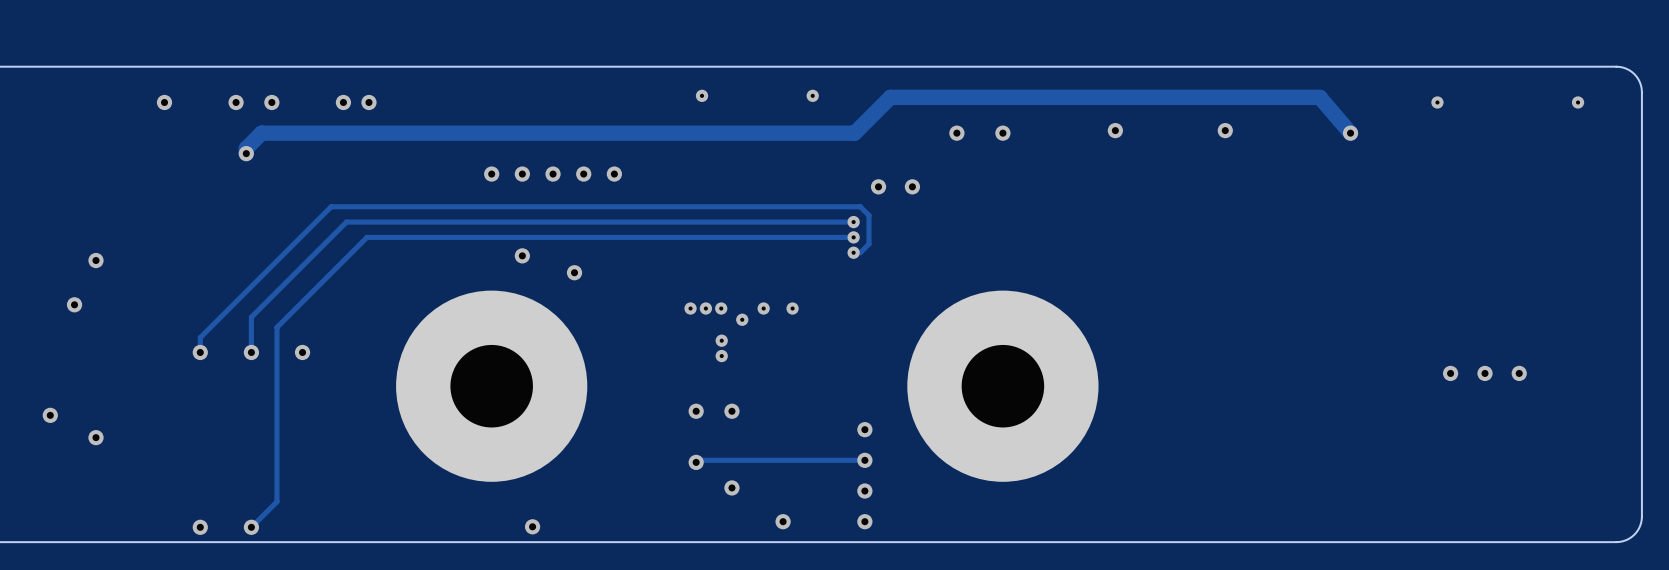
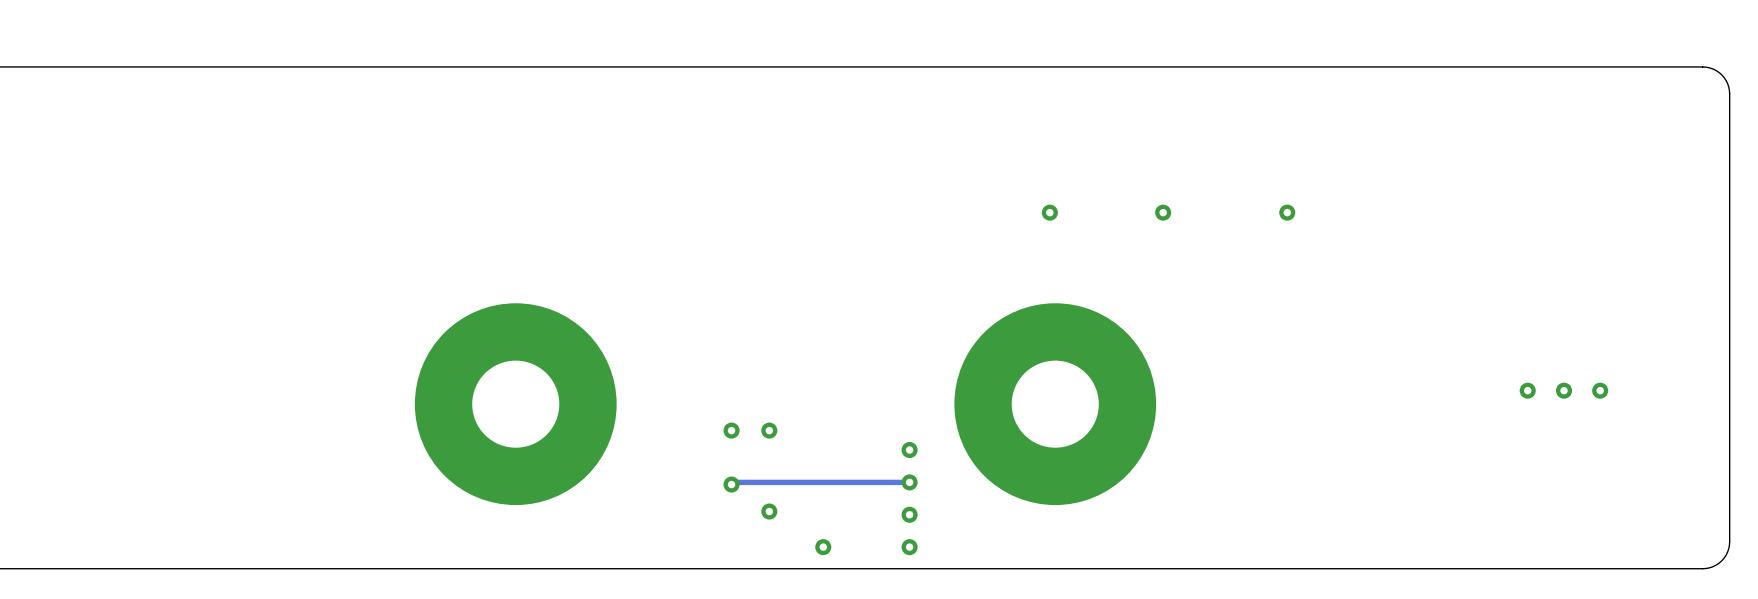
via: (702, 95) -> none
via: (812, 95) -> none
via: (164, 102) -> none
via: (236, 102) -> none
via: (271, 102) -> none
via: (343, 102) -> none
via: (368, 102) -> none
via: (1437, 102) -> none
via: (1578, 102) -> none
via: (1115, 130) -> none
via: (1225, 130) -> none
via: (956, 133) -> none
via: (1002, 133) -> none
track: (1350, 133) (1319, 97) (890, 97) (854, 133) (261, 133) (246, 148) (246, 153) -> none
via: (1350, 133) -> none
via: (246, 153) -> none
via: (491, 174) -> none
via: (522, 174) -> none
via: (553, 174) -> none
via: (583, 174) -> none
via: (614, 174) -> none
via: (878, 186) -> none
via: (912, 186) -> none
via: none -> (1049, 212)
via: none -> (1163, 212)
via: none -> (1287, 212)
track: (853, 222) (346, 222) (251, 317) (251, 352) -> none
via: (853, 222) -> none
track: (853, 237) (367, 237) (276, 327) (276, 501) (251, 527) -> none
via: (853, 237) -> none
track: (853, 252) (860, 252) (868, 244) (868, 215) (860, 206) (331, 206) (200, 337) (200, 352) -> none
via: (853, 252) -> none
via: (522, 255) -> none
via: (96, 260) -> none
via: (574, 272) -> none
via: (74, 304) -> none
via: (690, 308) -> none
via: (705, 308) -> none
via: (721, 308) -> none
via: (763, 308) -> none
via: (792, 308) -> none
via: (742, 319) -> none
via: (721, 340) -> none
via: (200, 352) -> none
via: (251, 352) -> none
via: (302, 352) -> none
via: (721, 356) -> none
via: (50, 415) -> none
via: (96, 437) -> none
via: (532, 526) -> none
via: (200, 527) -> none
via: (251, 527) -> none

